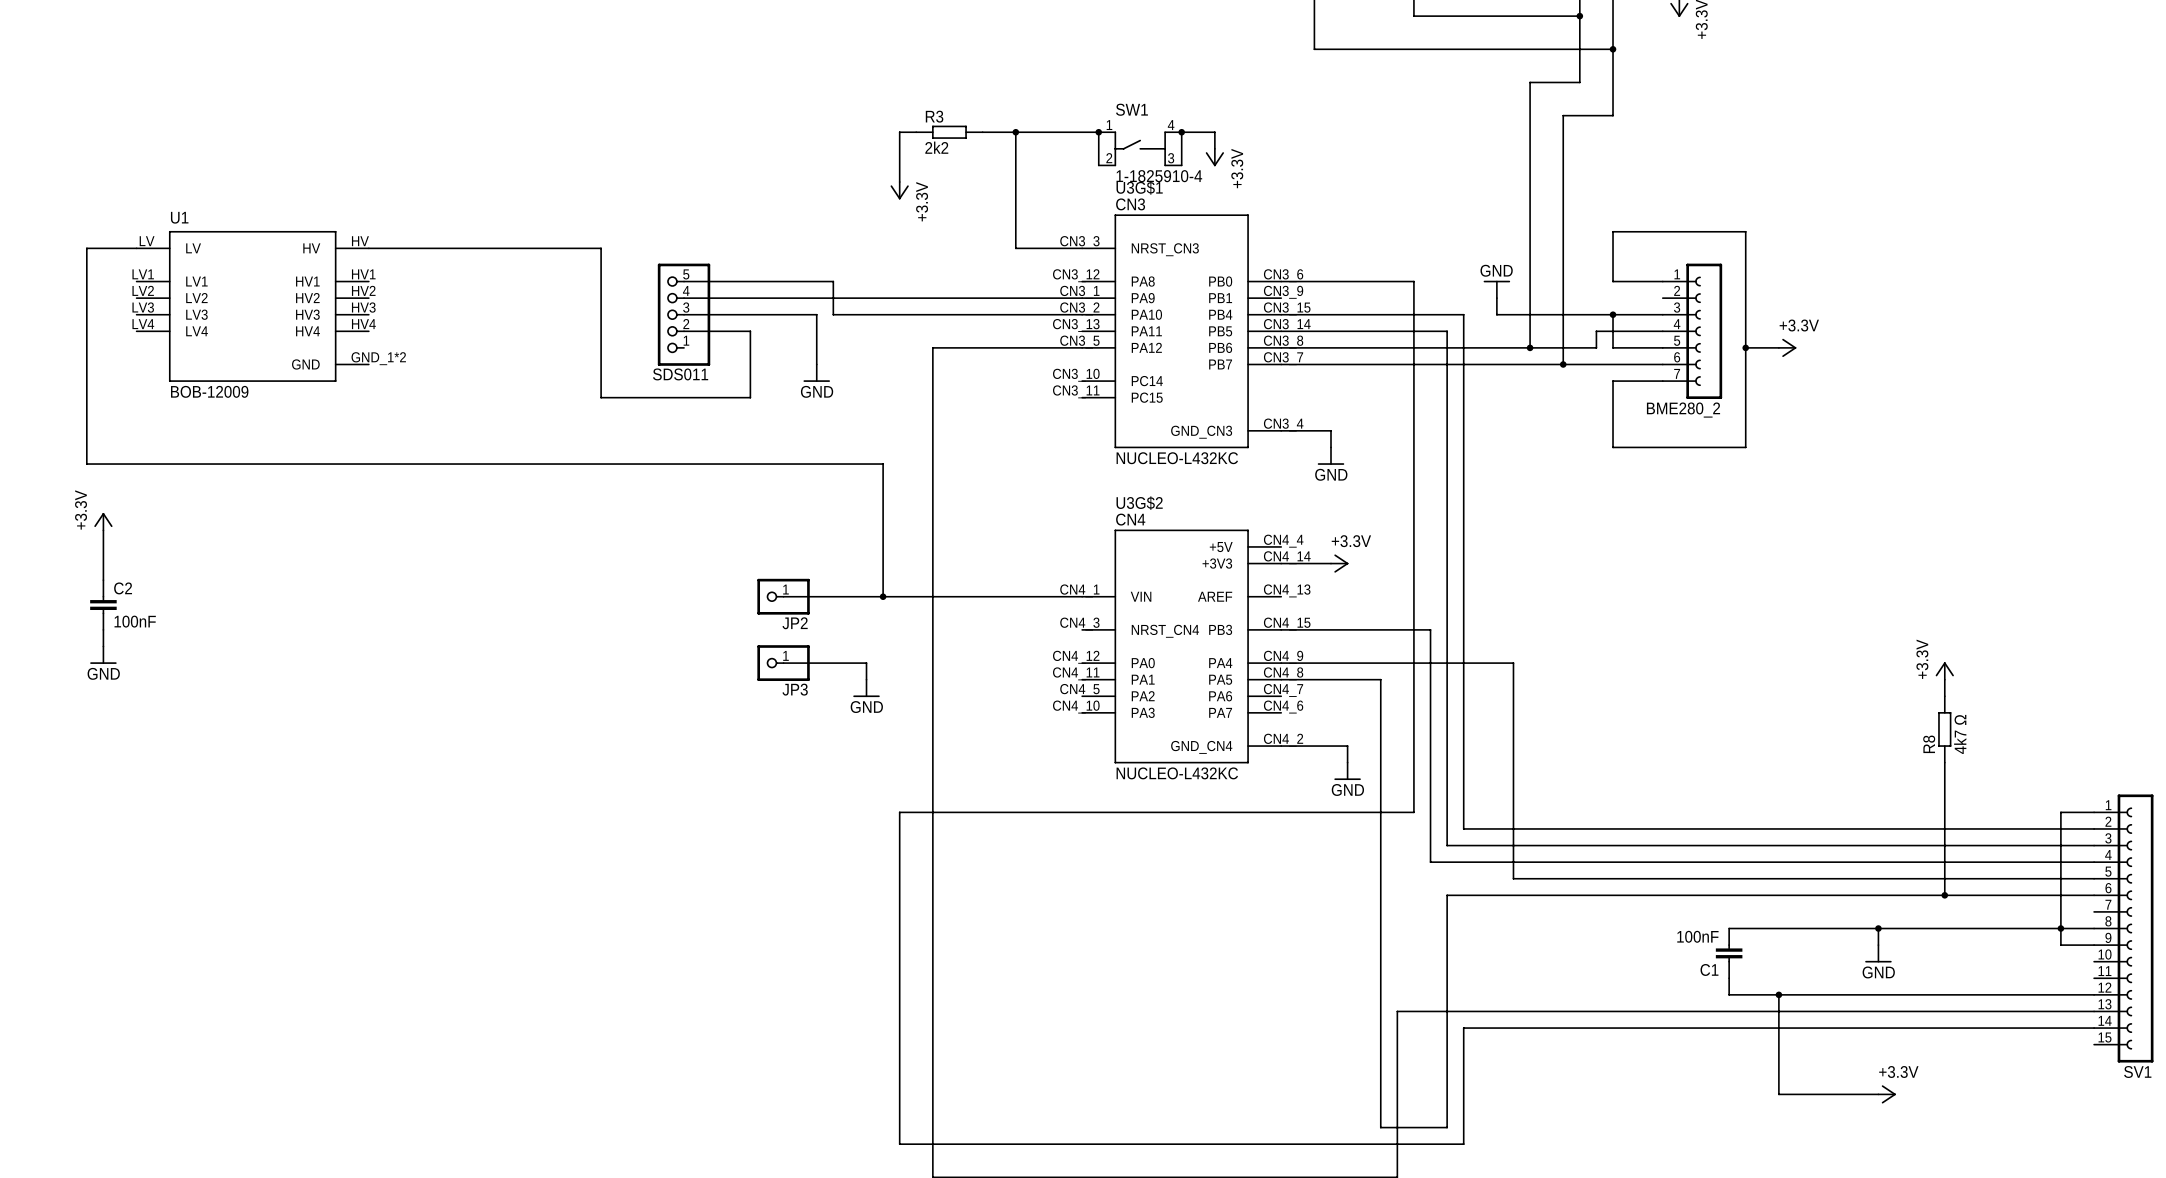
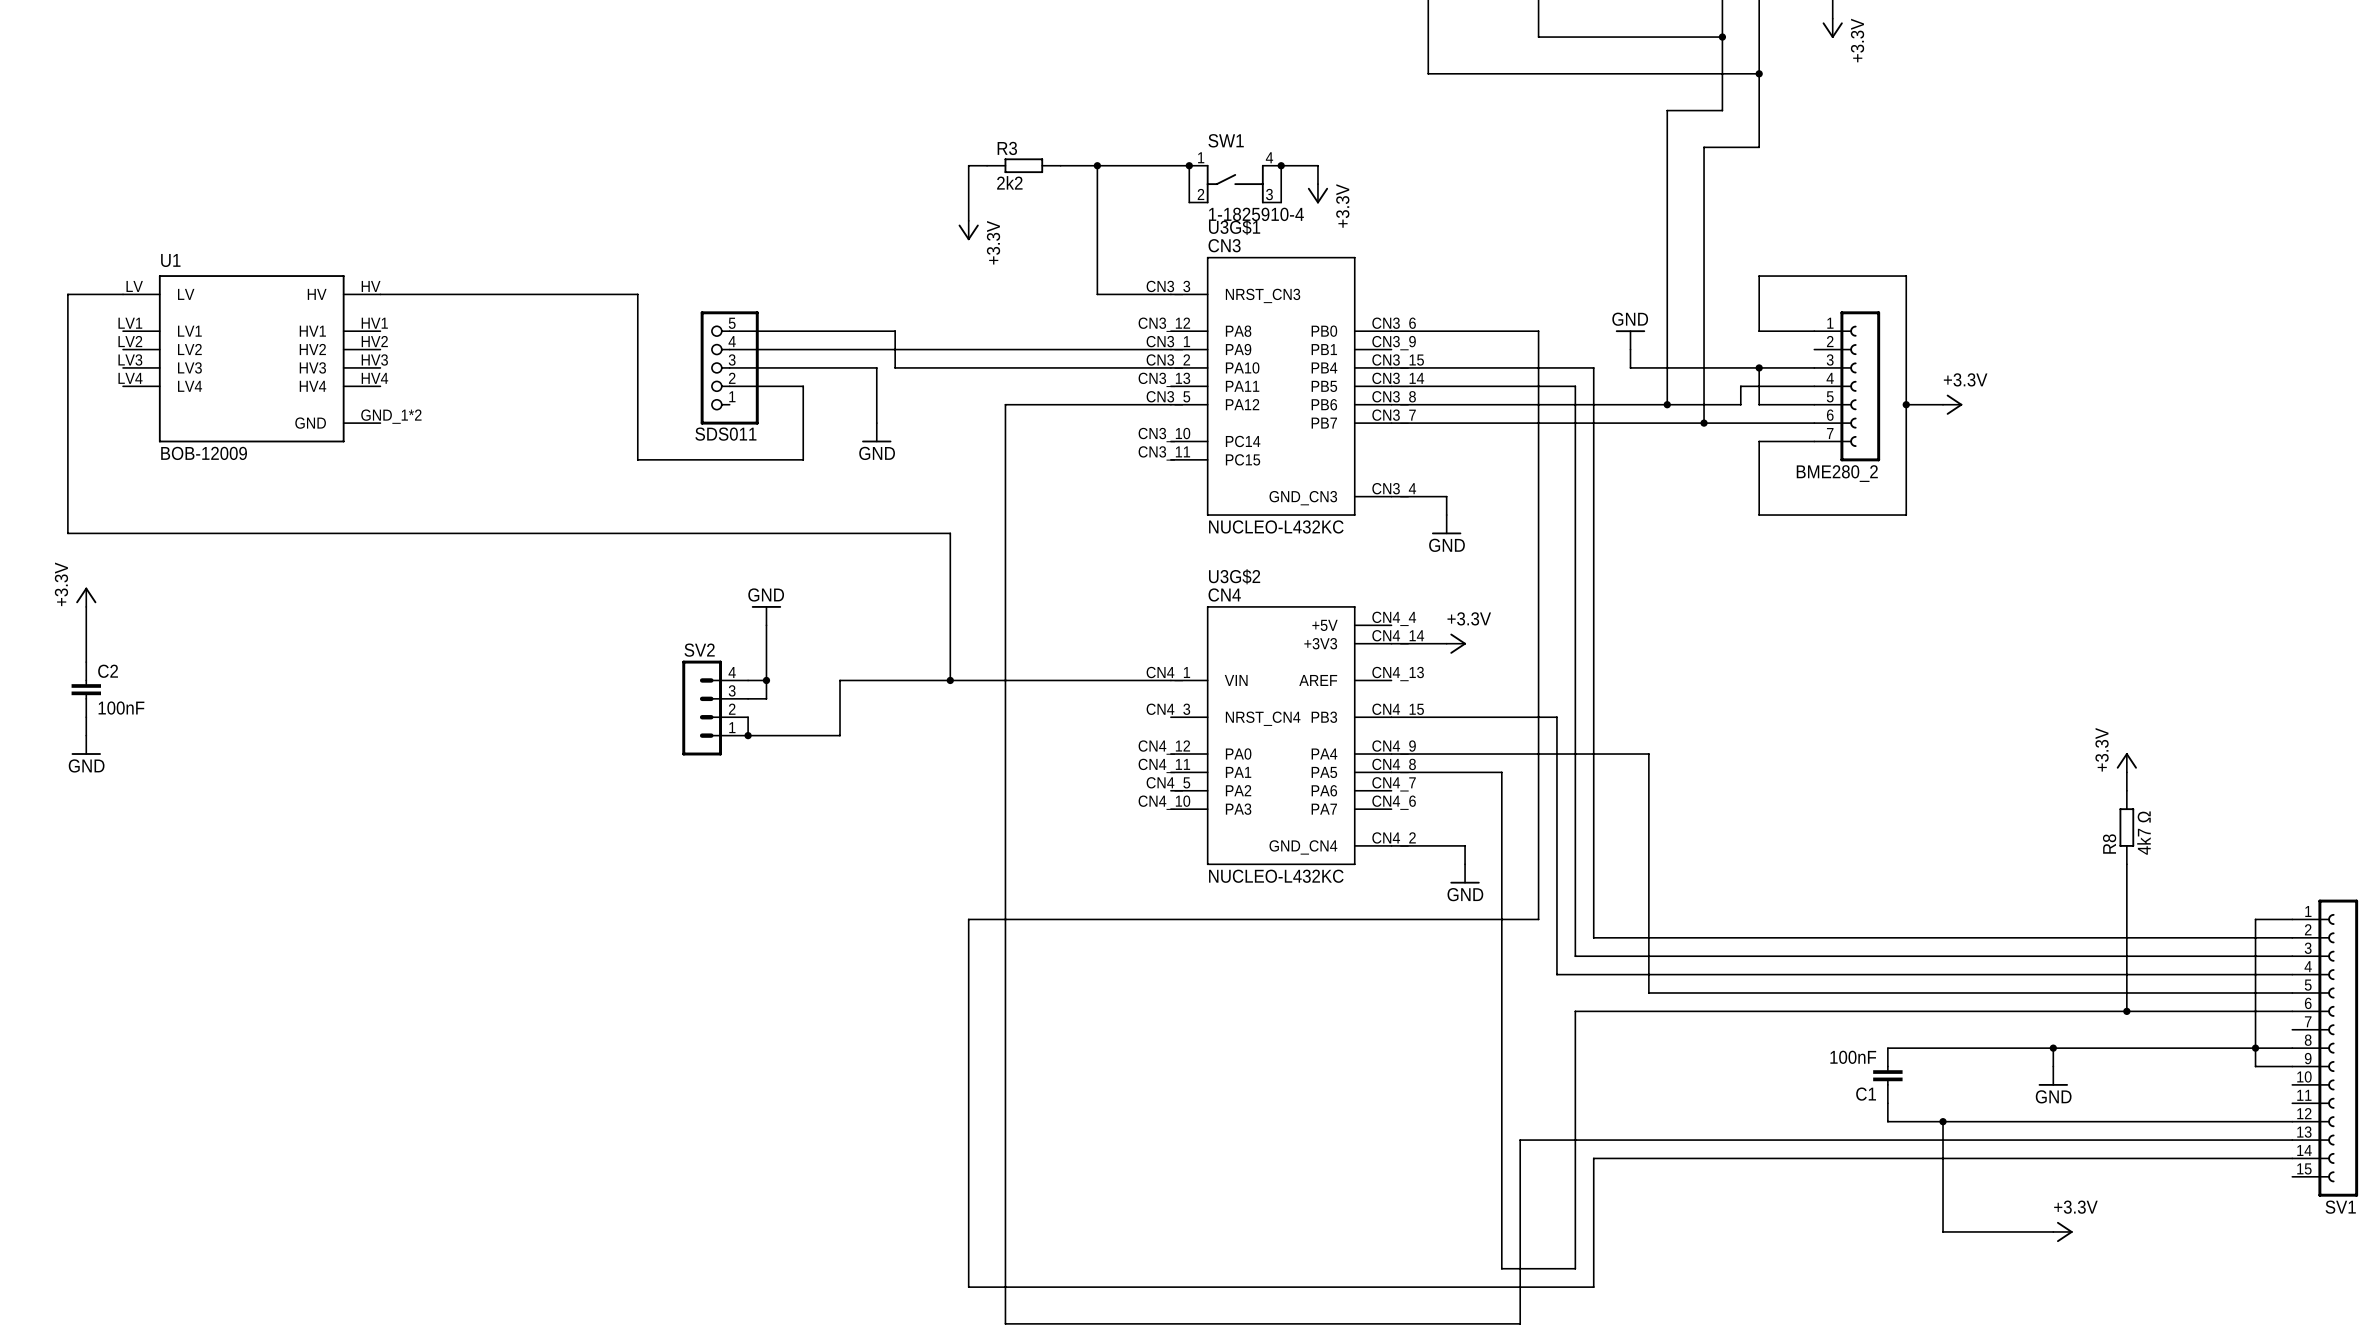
power symbol: none -> GND (766, 615)
wire: none -> (766, 625) (766, 698) (748, 698)
wire: none -> (748, 680) (766, 680)
junction: none -> (766, 680)
wire: none -> (840, 680) (840, 735) (748, 735) (748, 717)
JP2: (783, 596) -> none
SV2: none -> (715, 708)
junction: none -> (748, 735)
wire: (783, 663) (866, 663) (866, 679) -> none
JP3: (783, 663) -> none
power symbol: GND (866, 688) -> none

